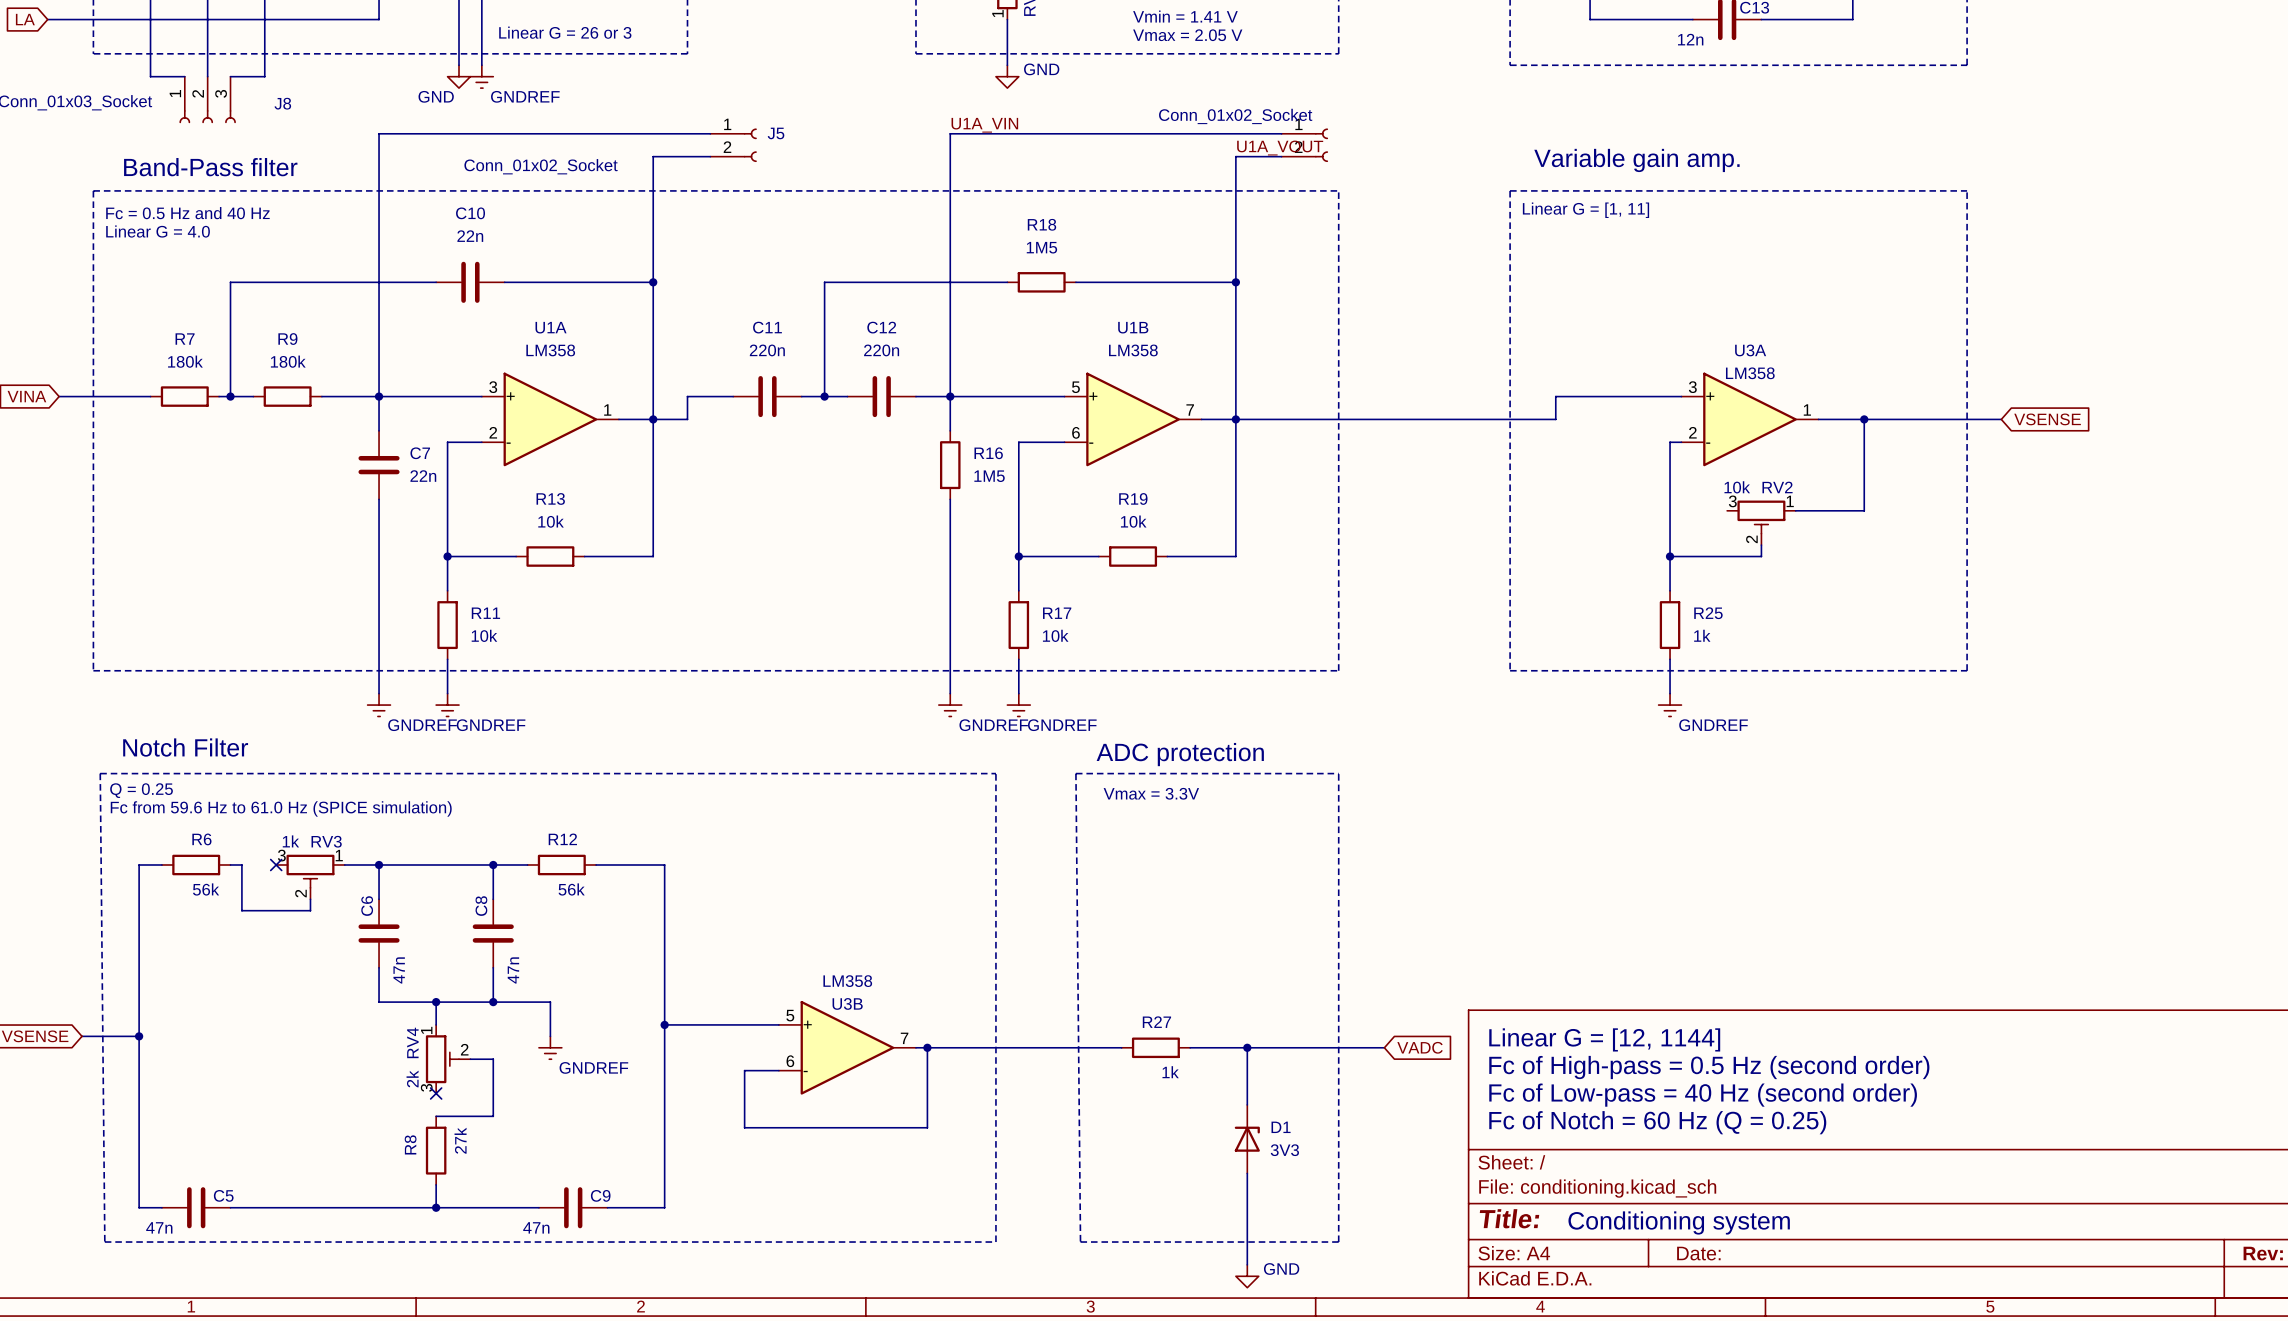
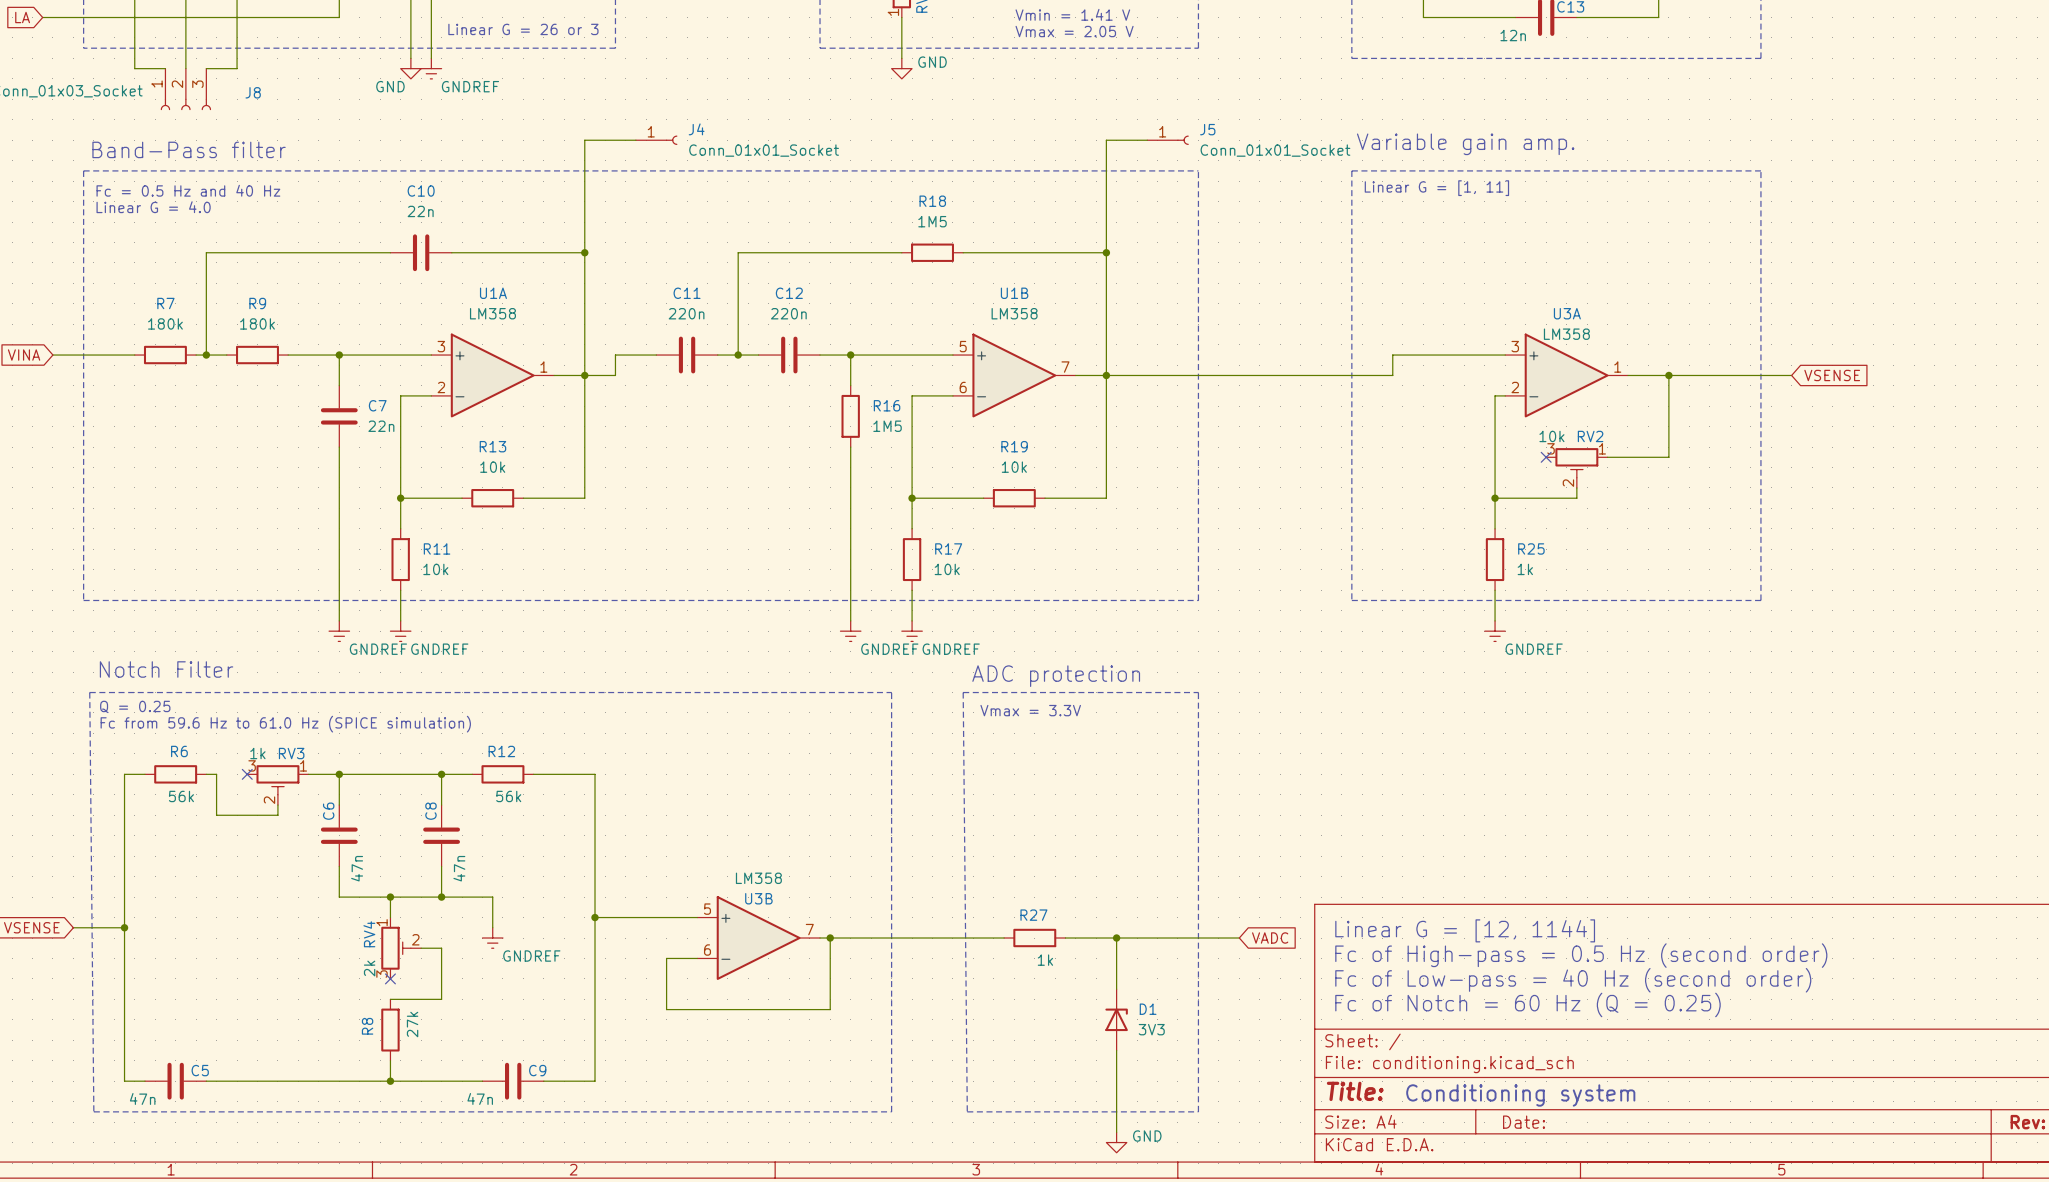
label: U1A_VIN (984, 125) -> none
J5 symbol: [710, 128, 757, 162] -> [1147, 135, 1189, 145]
wire: (710, 133) (379, 133) (379, 396) -> none
wire: (1281, 133) (950, 133) (950, 396) -> none
part: Conn_01x02_Socket (1304, 145) -> none
label: U1A_VOUT (1280, 148) -> none
J4: none -> Conn_01x01_Socket (656, 140)
J5 value: Conn_01x02_Socket (541, 166) -> Conn_01x01_Socket (1275, 150)
no-connect mark: none -> (1546, 457)

